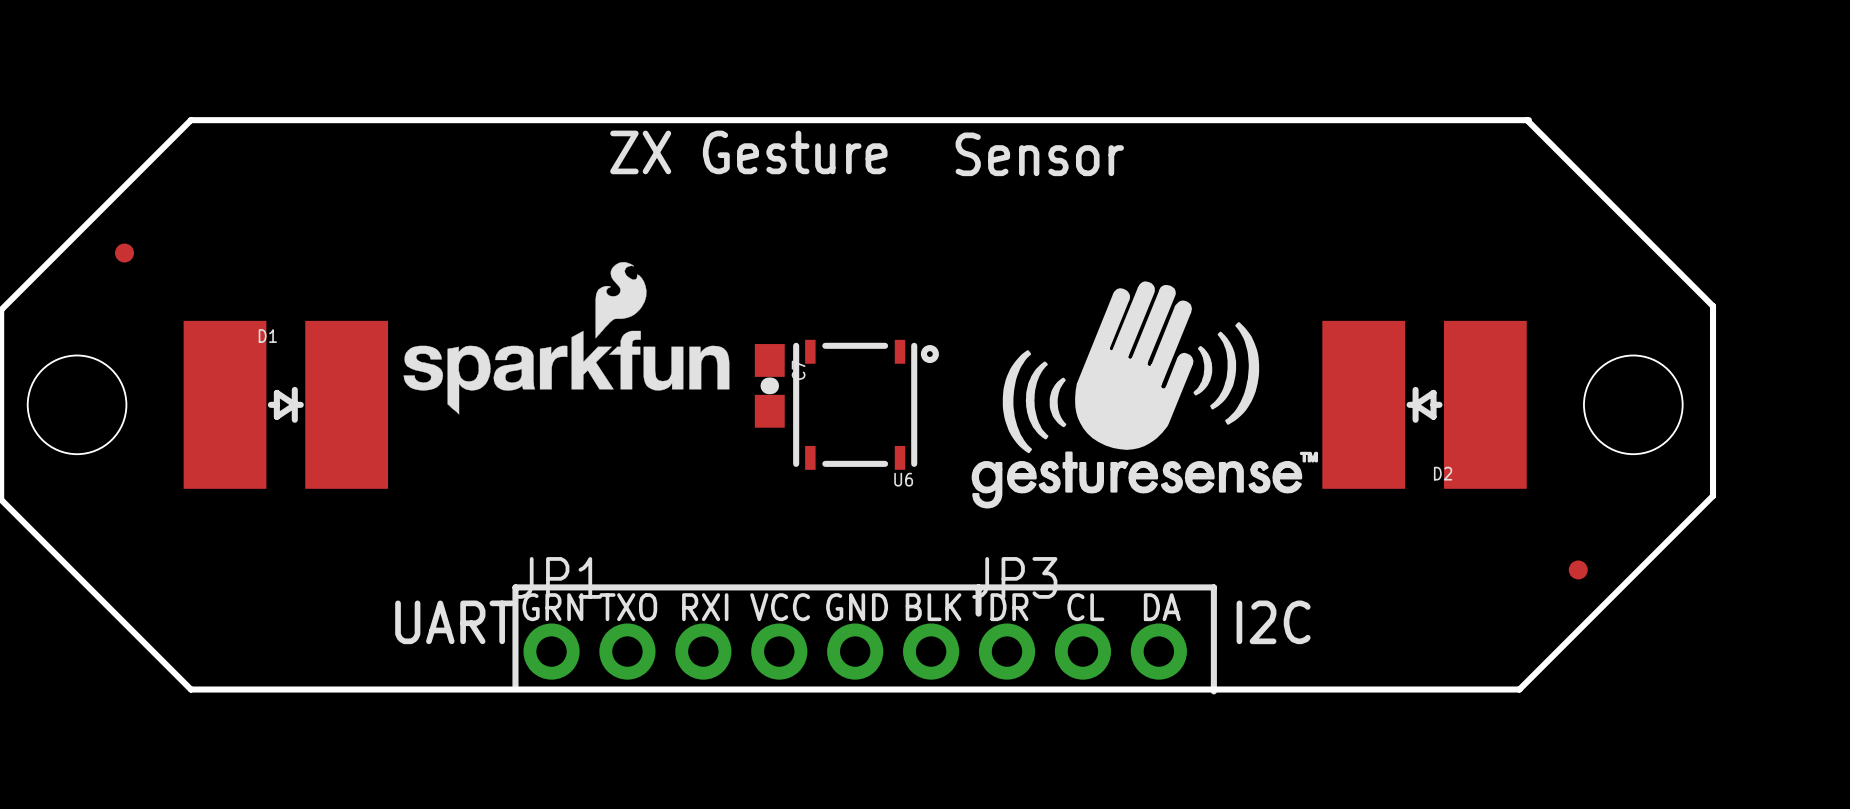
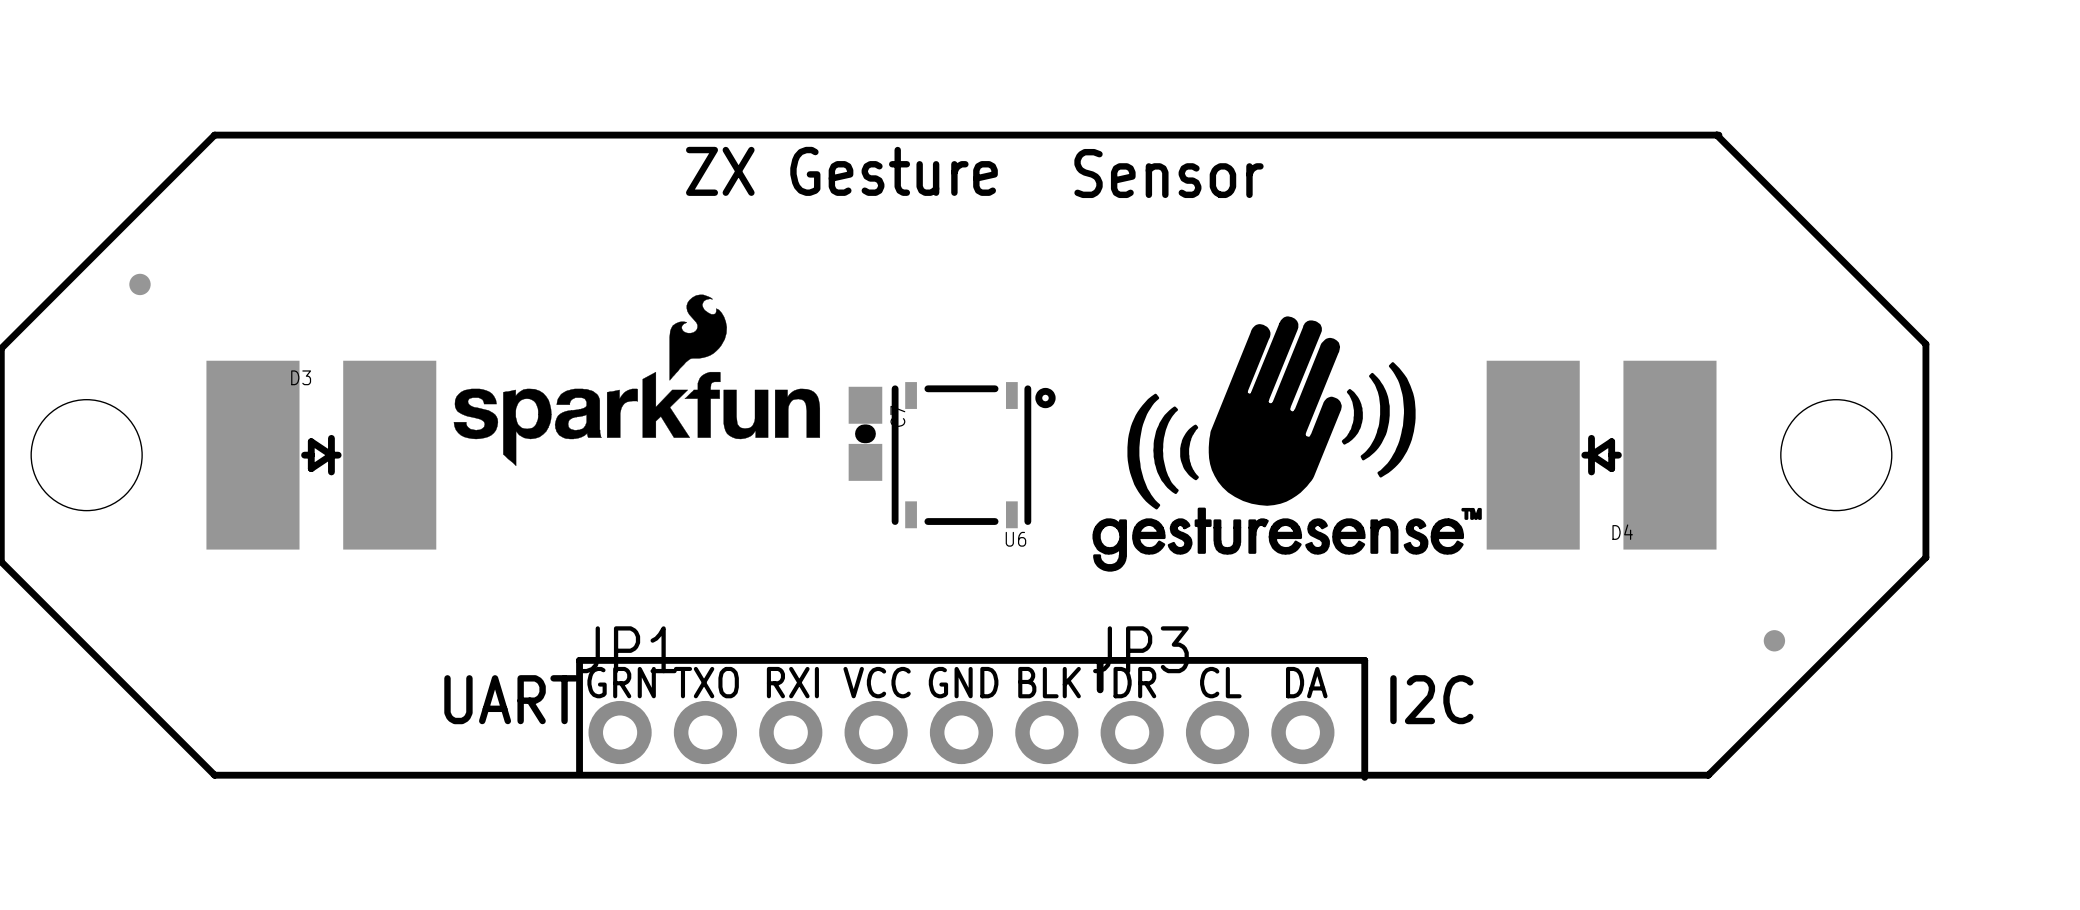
D1 name: D1 (267, 336) -> D3 (301, 377)
D2 name: D2 (1443, 473) -> D4 (1622, 532)

